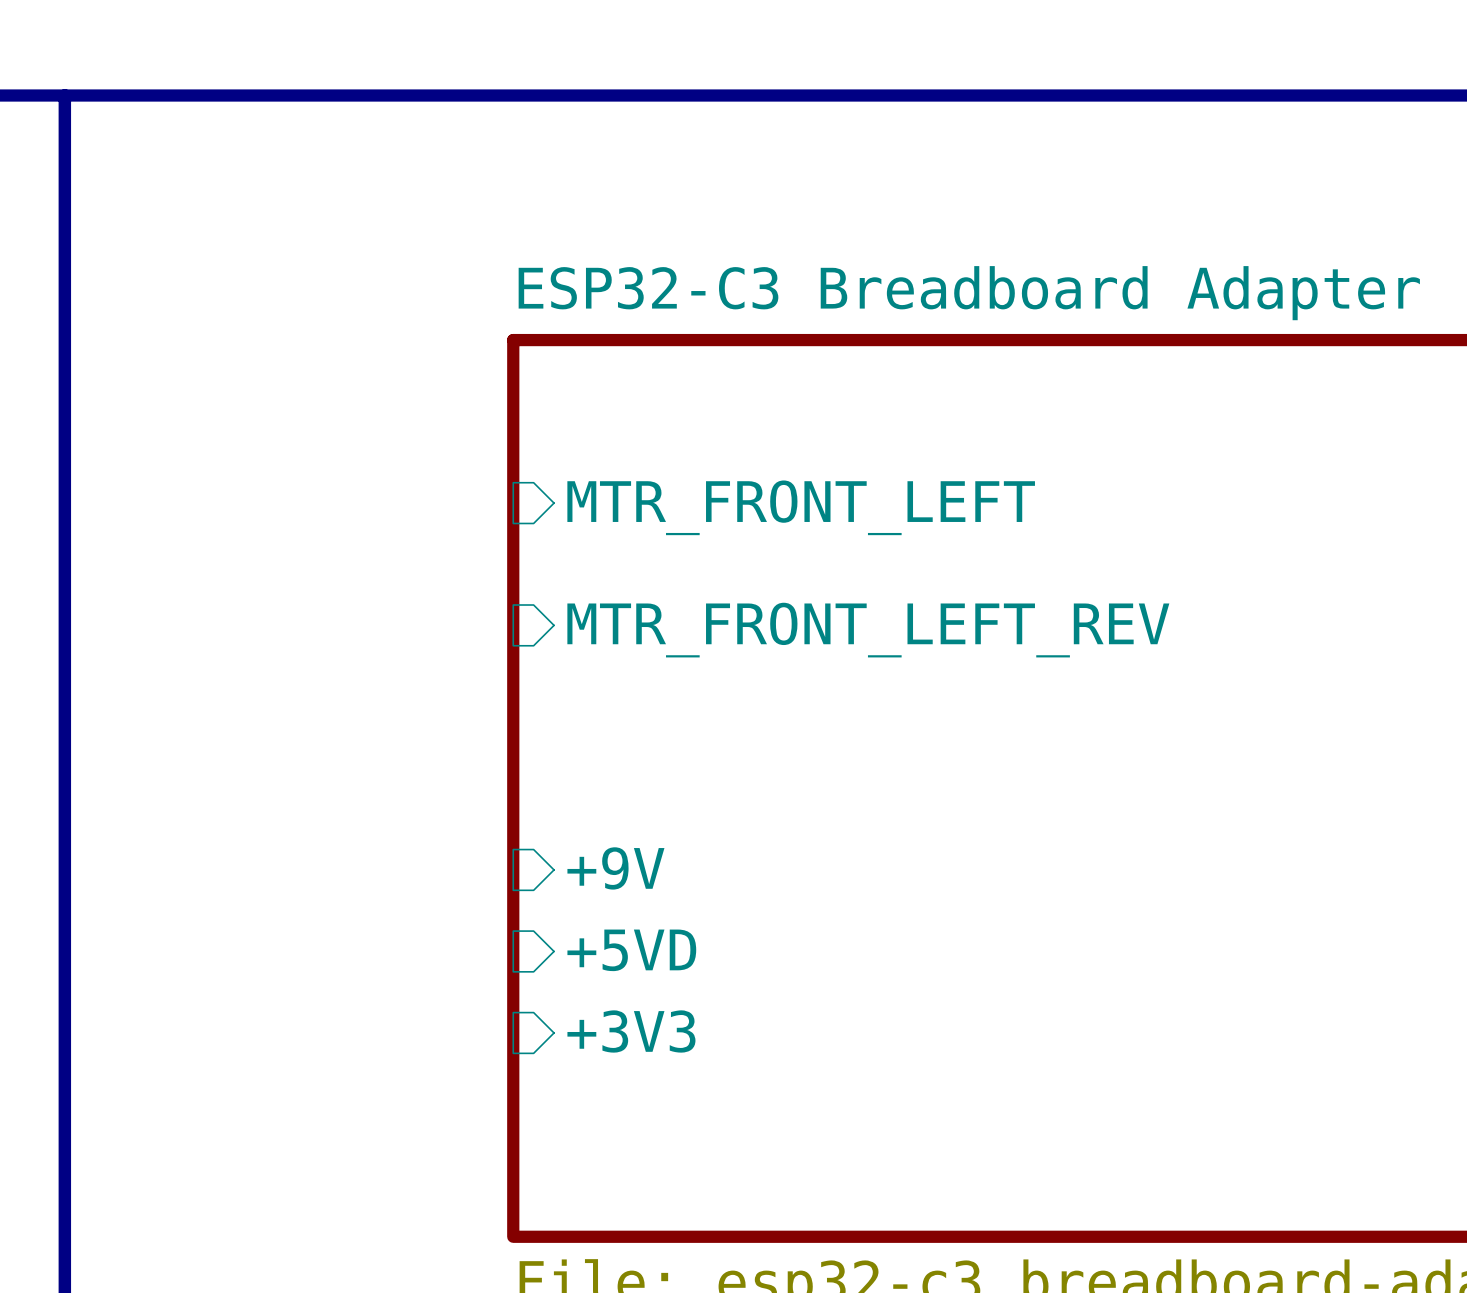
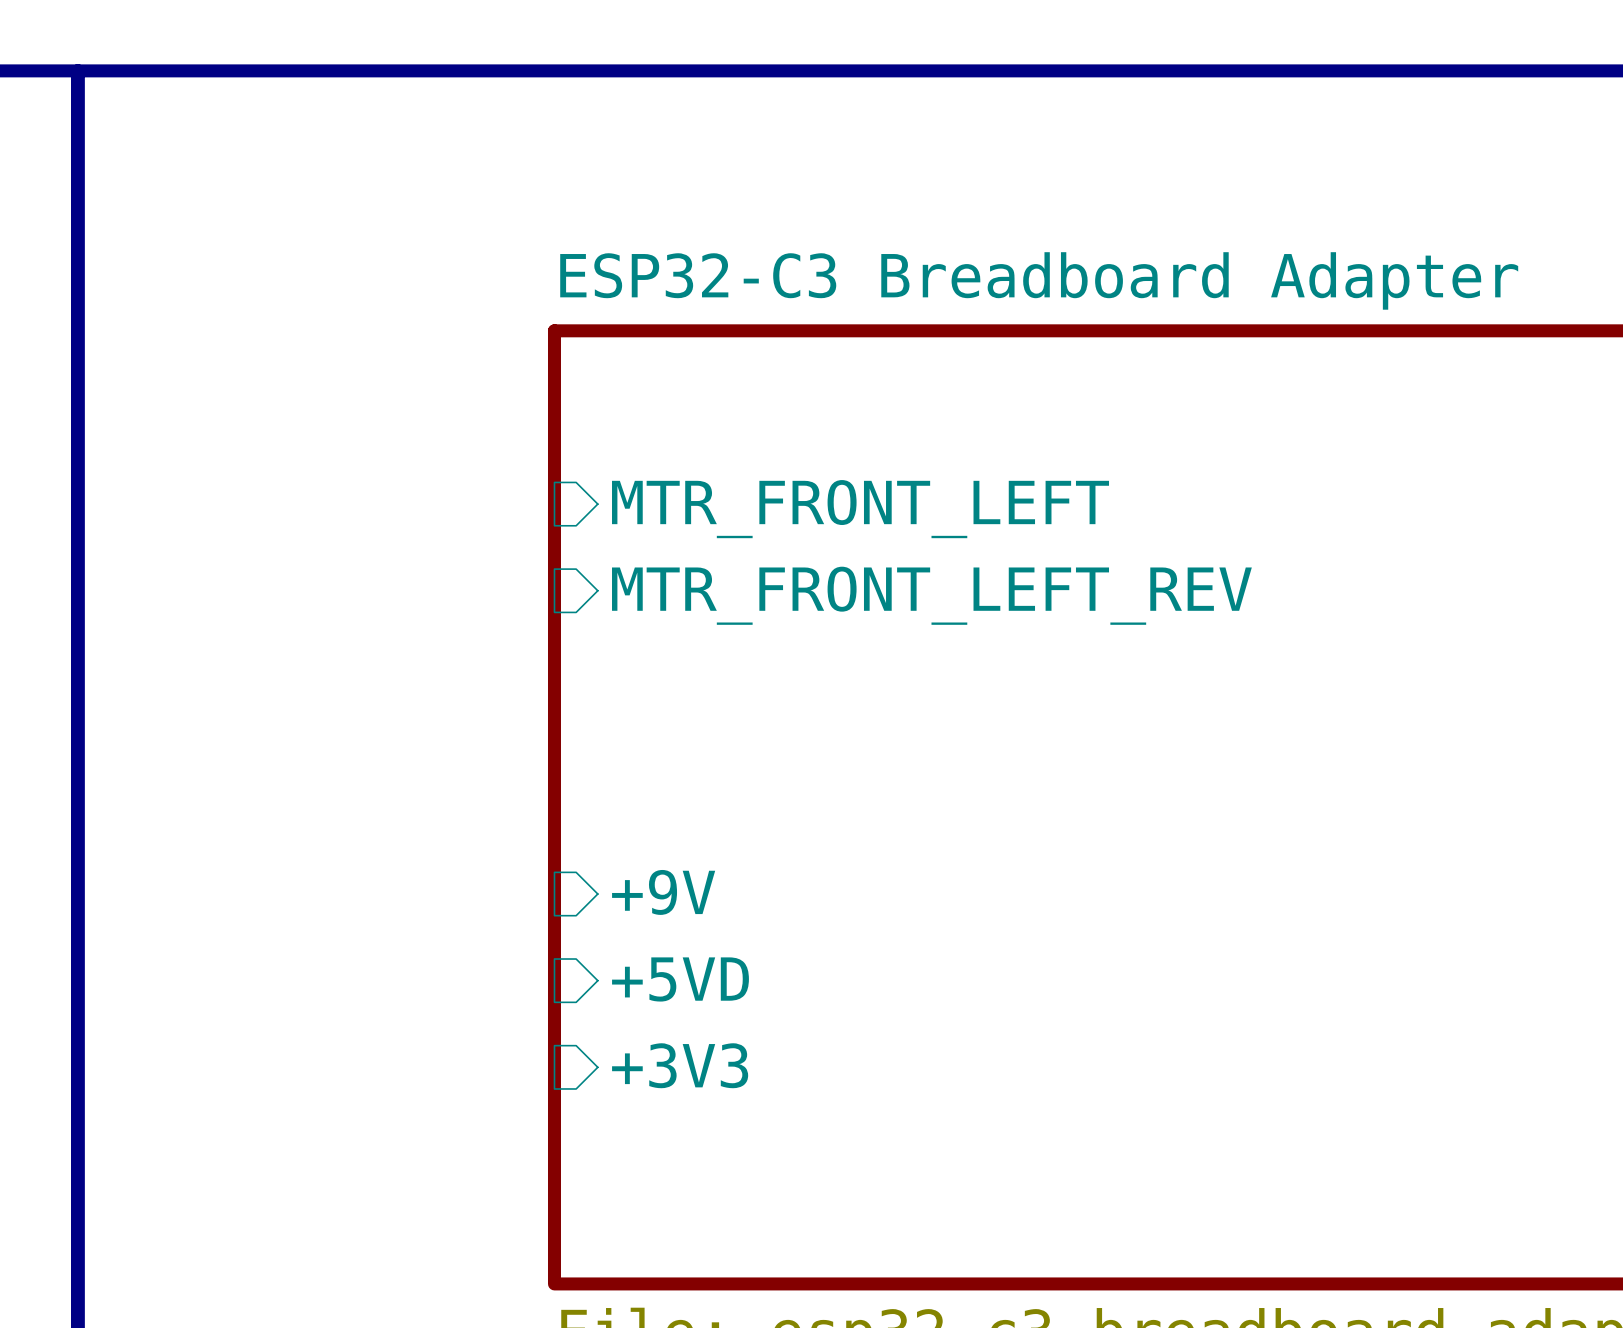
sheet pin position: MTR_FRONT_LEFT_REV (868, 630) -> MTR_FRONT_LEFT_REV (931, 595)

